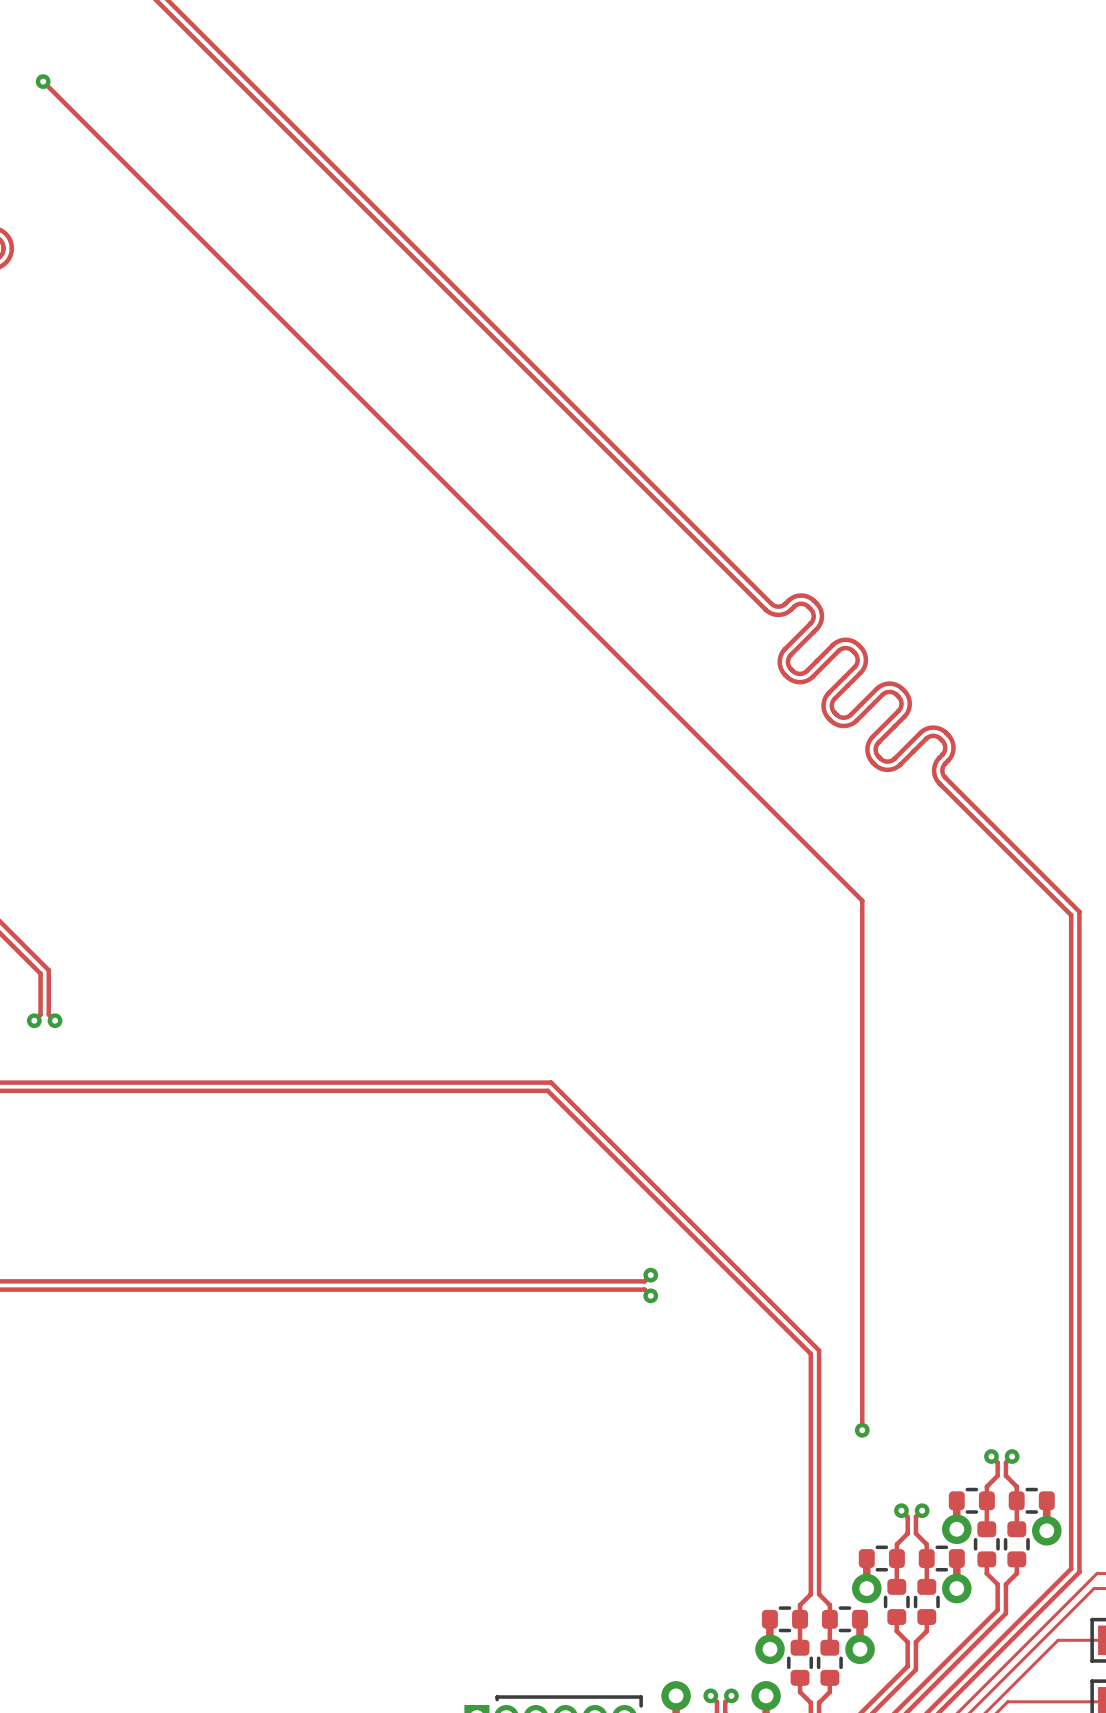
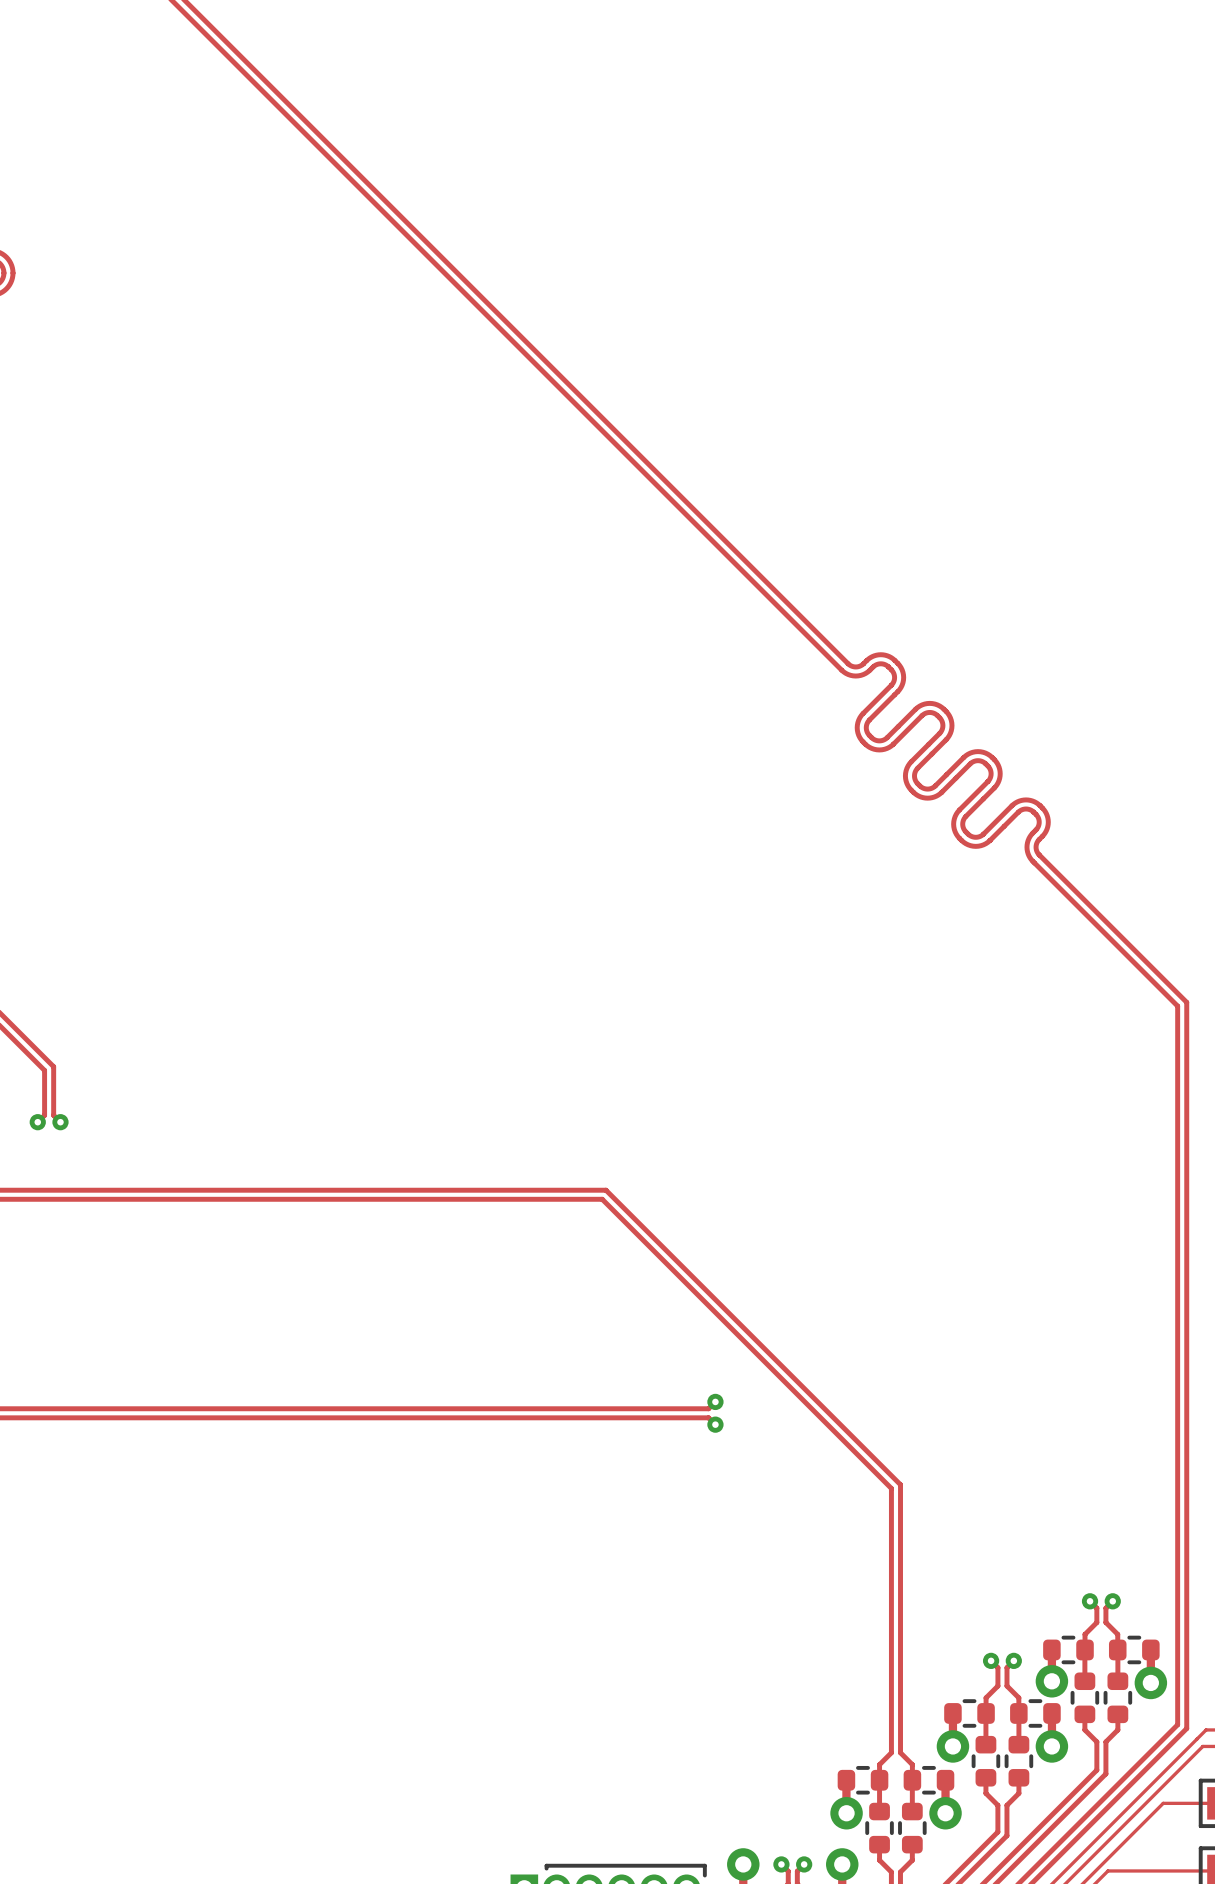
track: (43, 81) (862, 900) (862, 1430) -> none
via: (43, 81) -> none
via: (862, 1430) -> none

